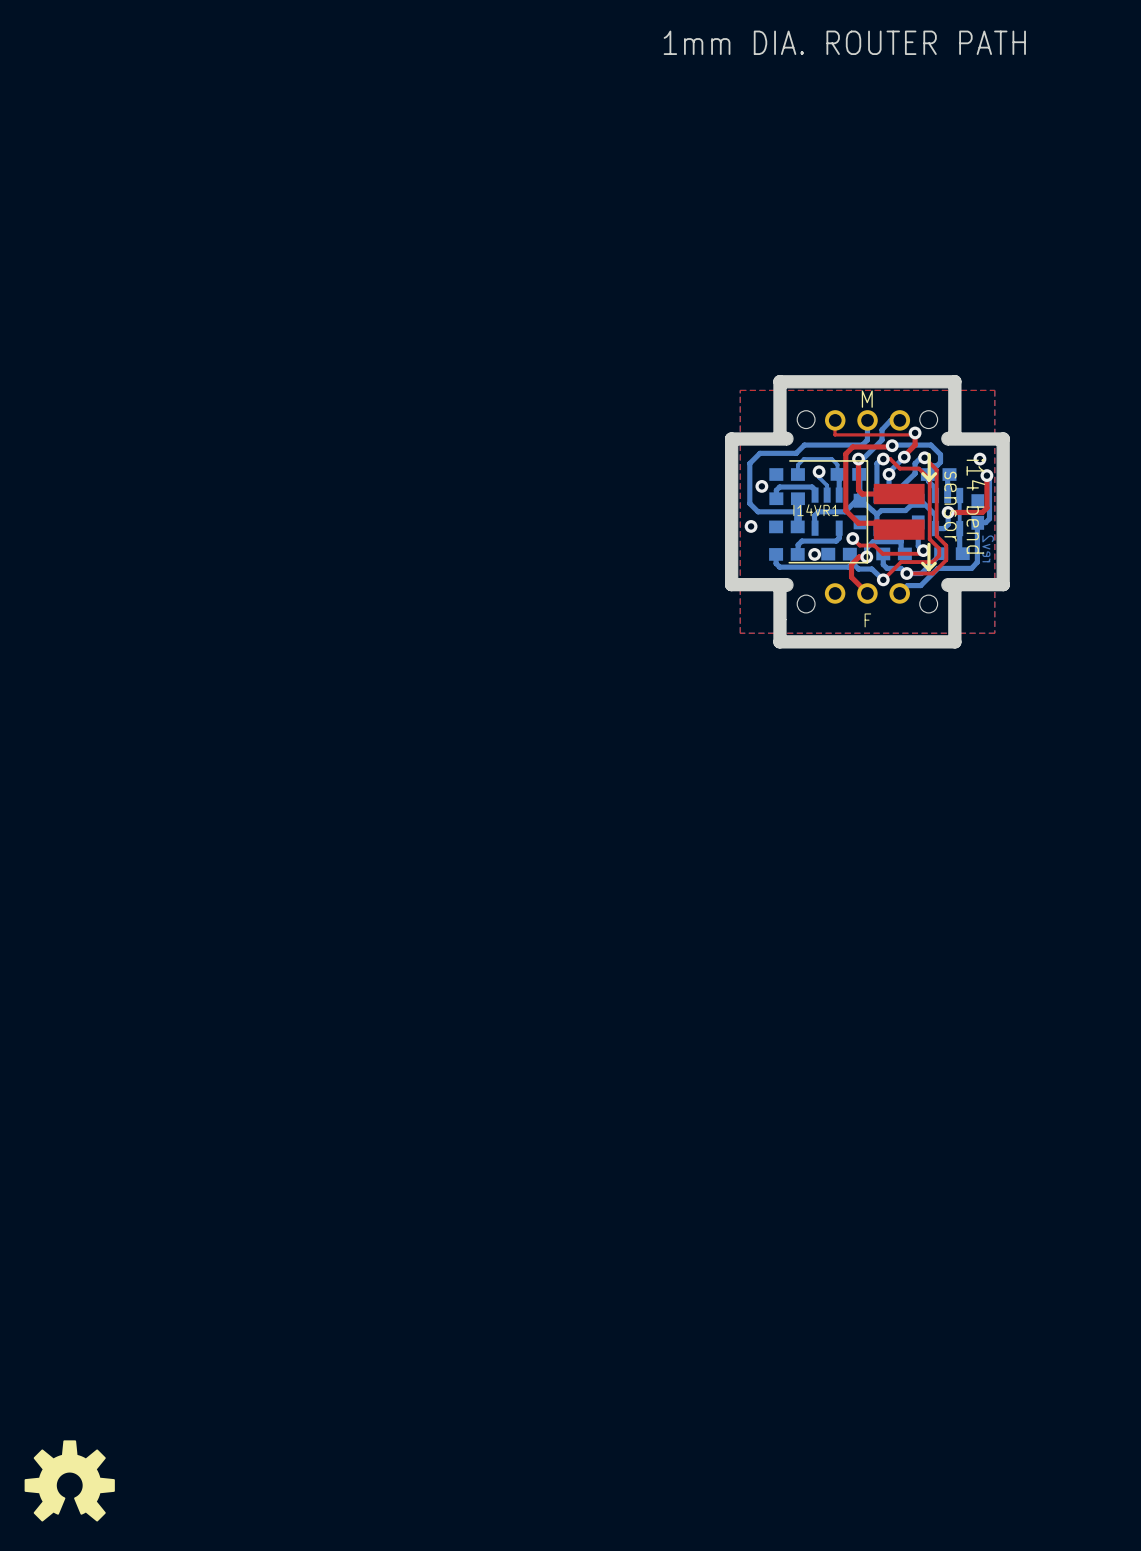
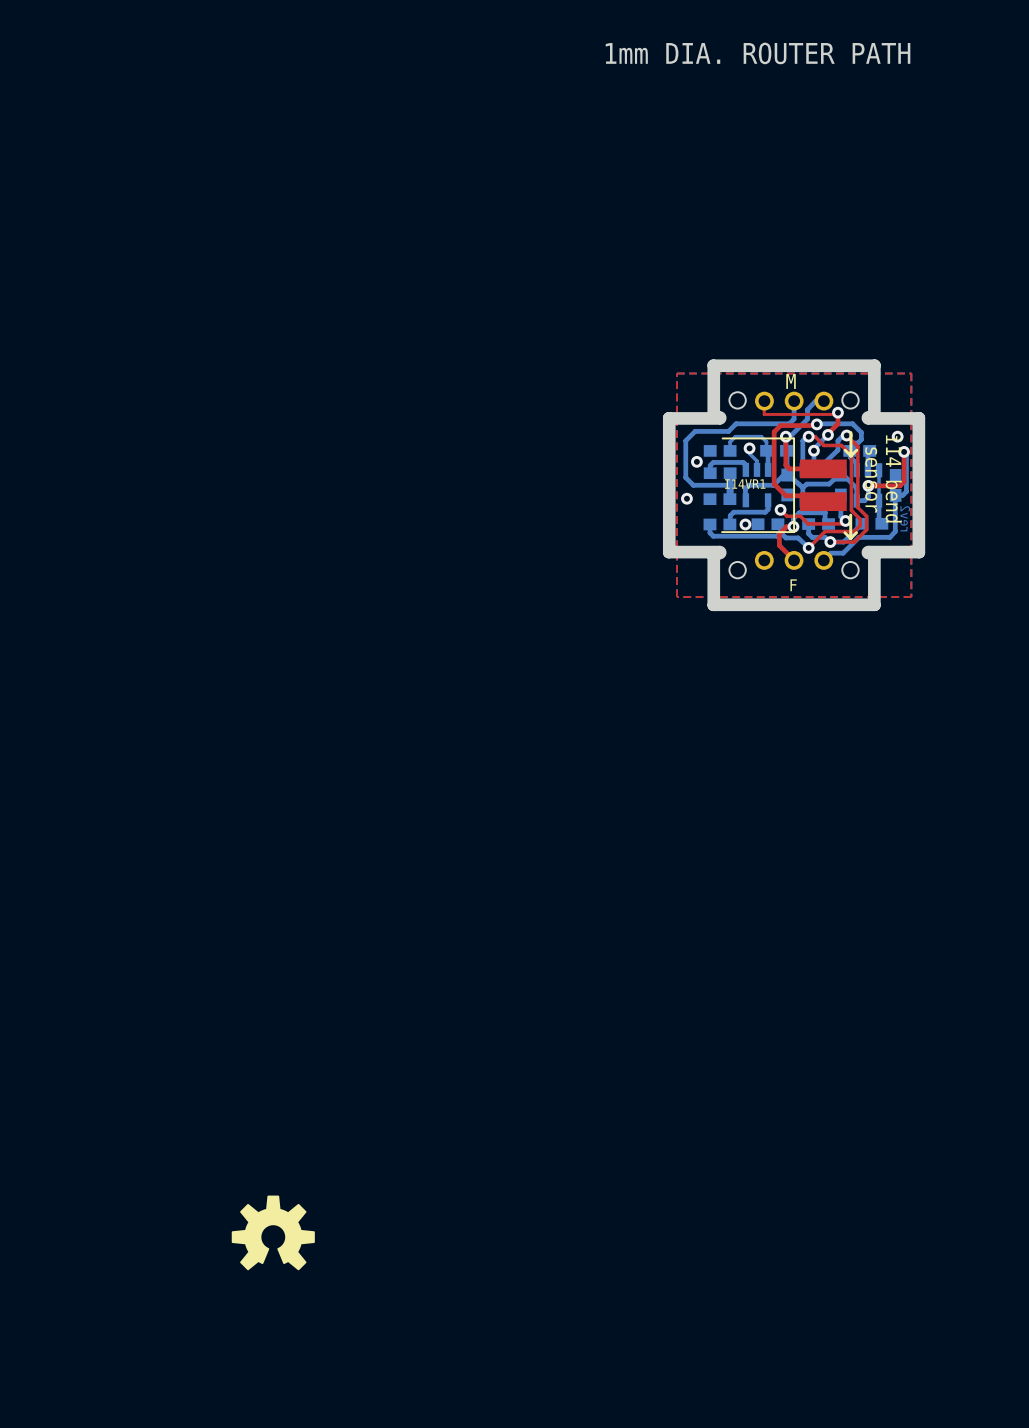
drawing position: (69, 1480) -> (273, 1232)

